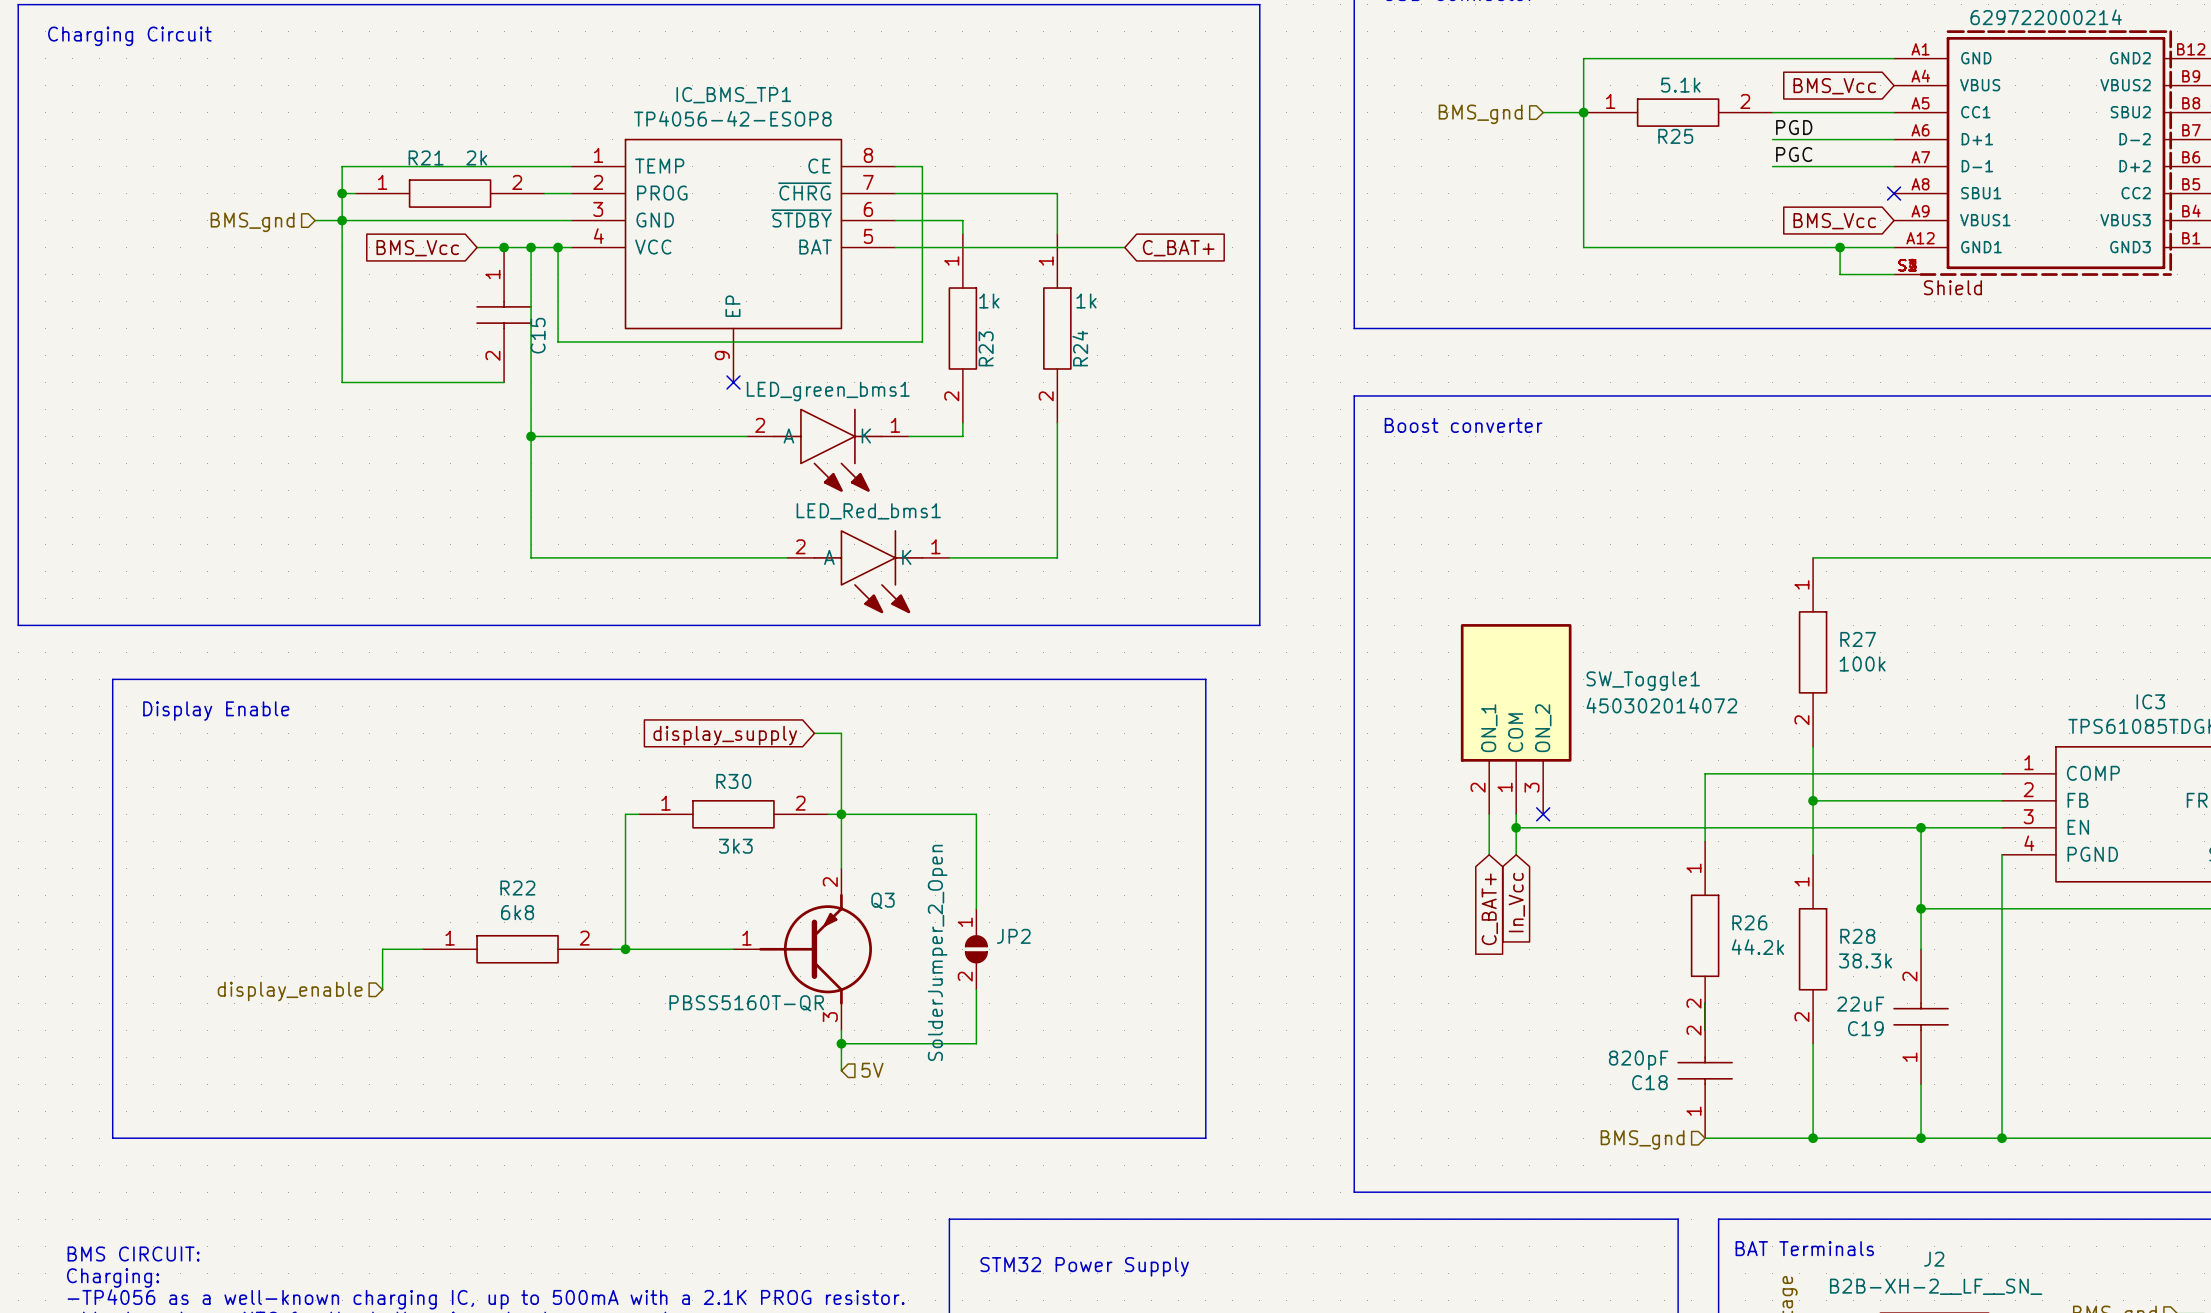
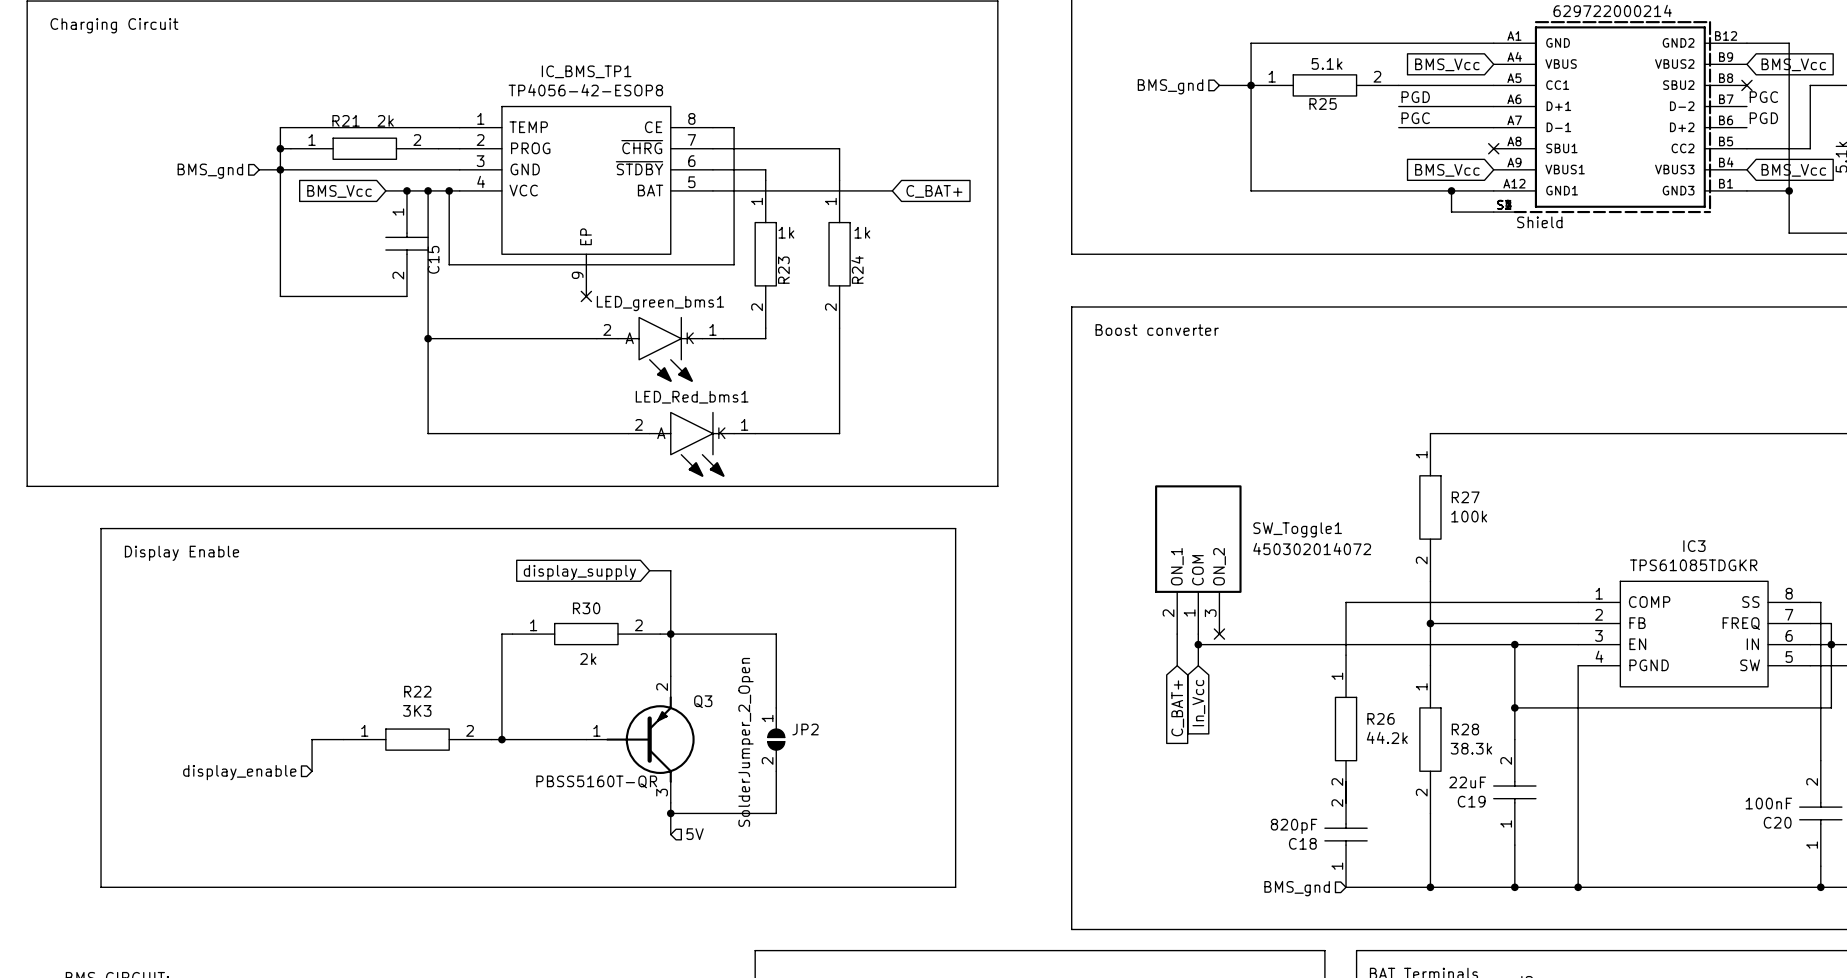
R30 value: 3k3 (735, 846) -> 2k (588, 659)
R22 value: 6k8 (517, 912) -> 3K3 (417, 710)

